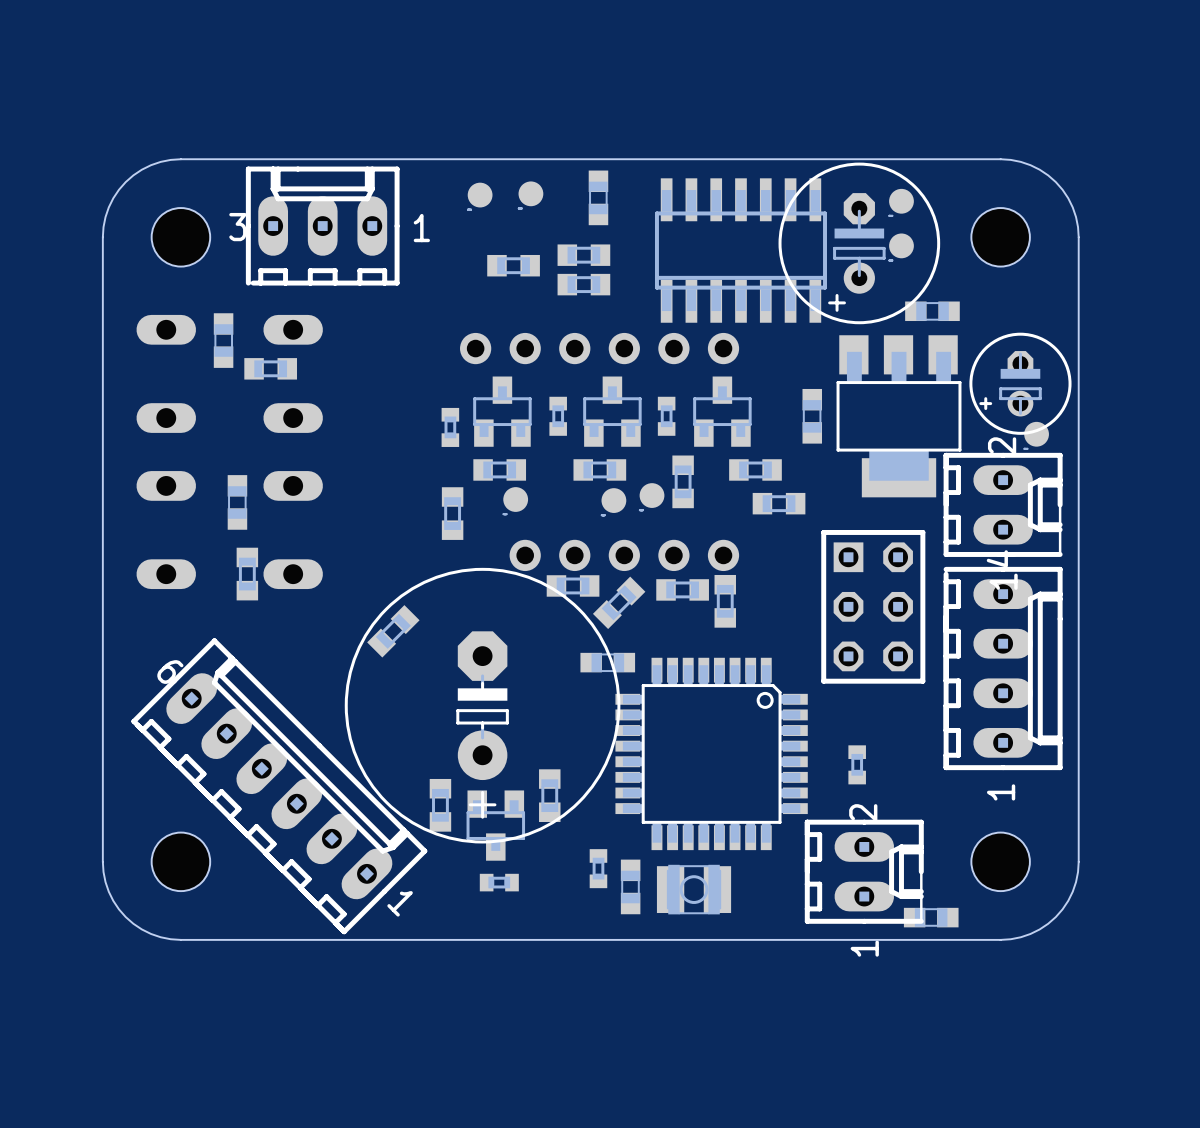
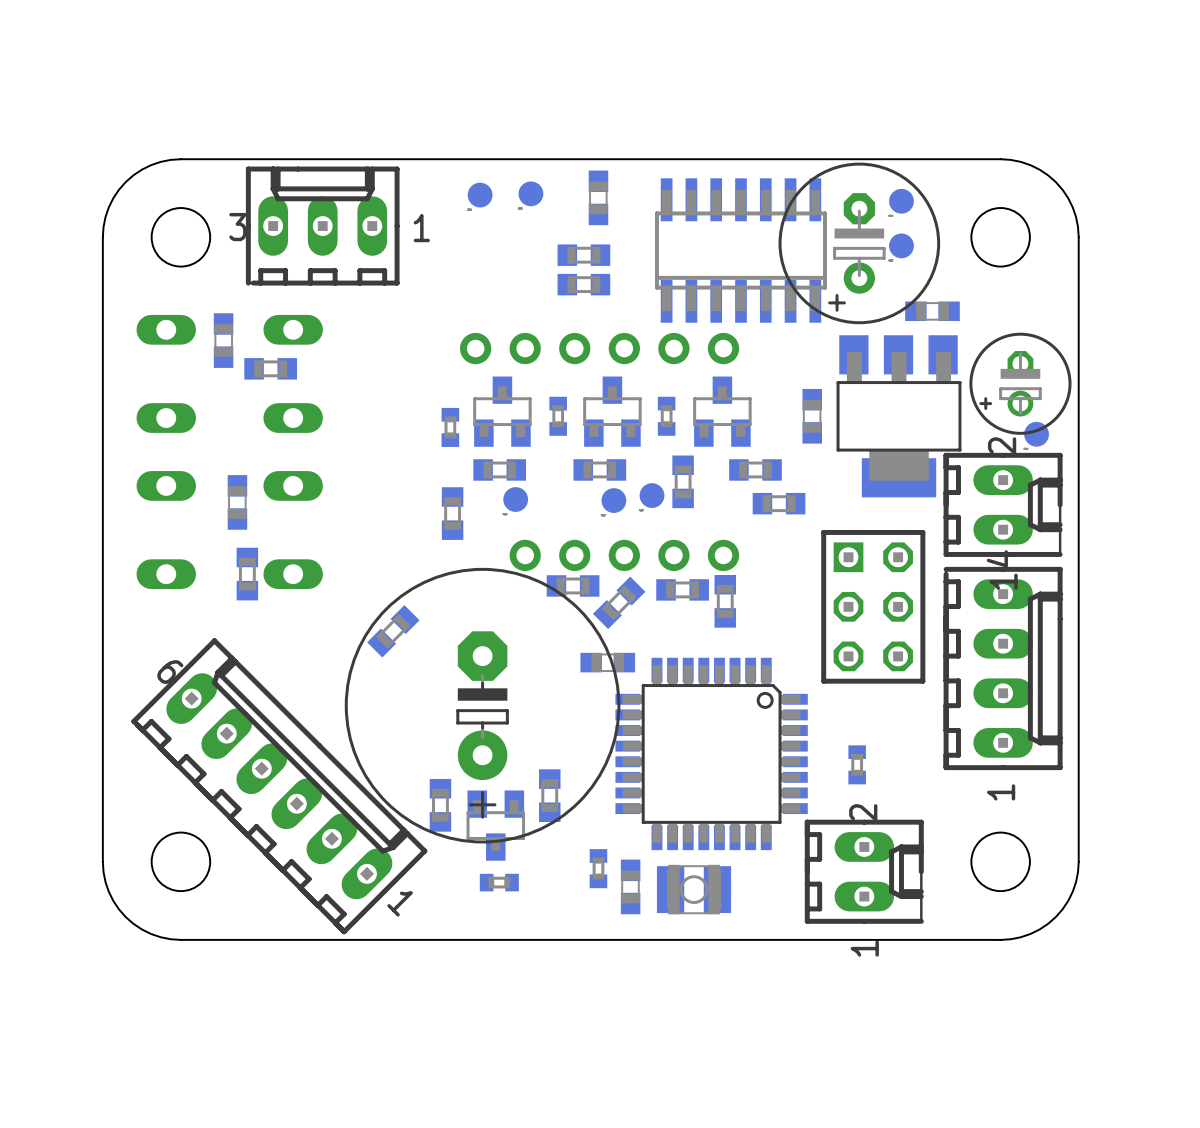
part: (513, 265) -> none
part: (931, 917) -> none

